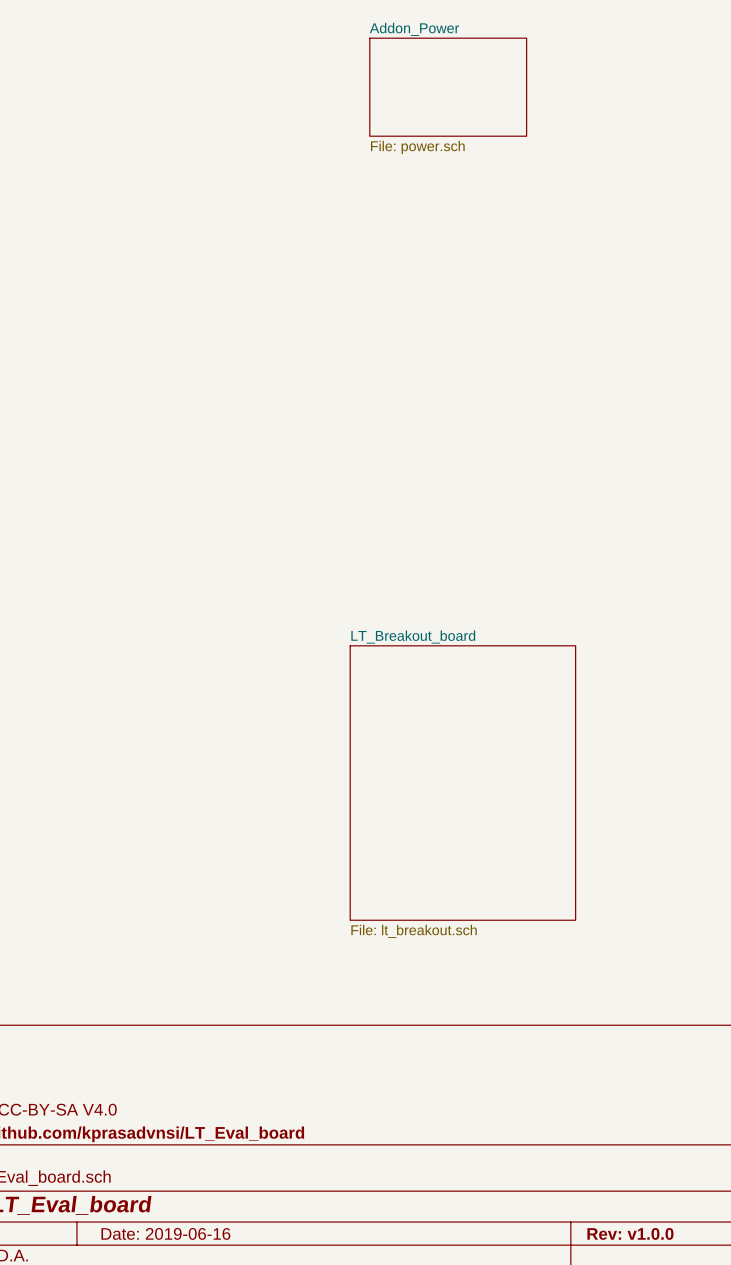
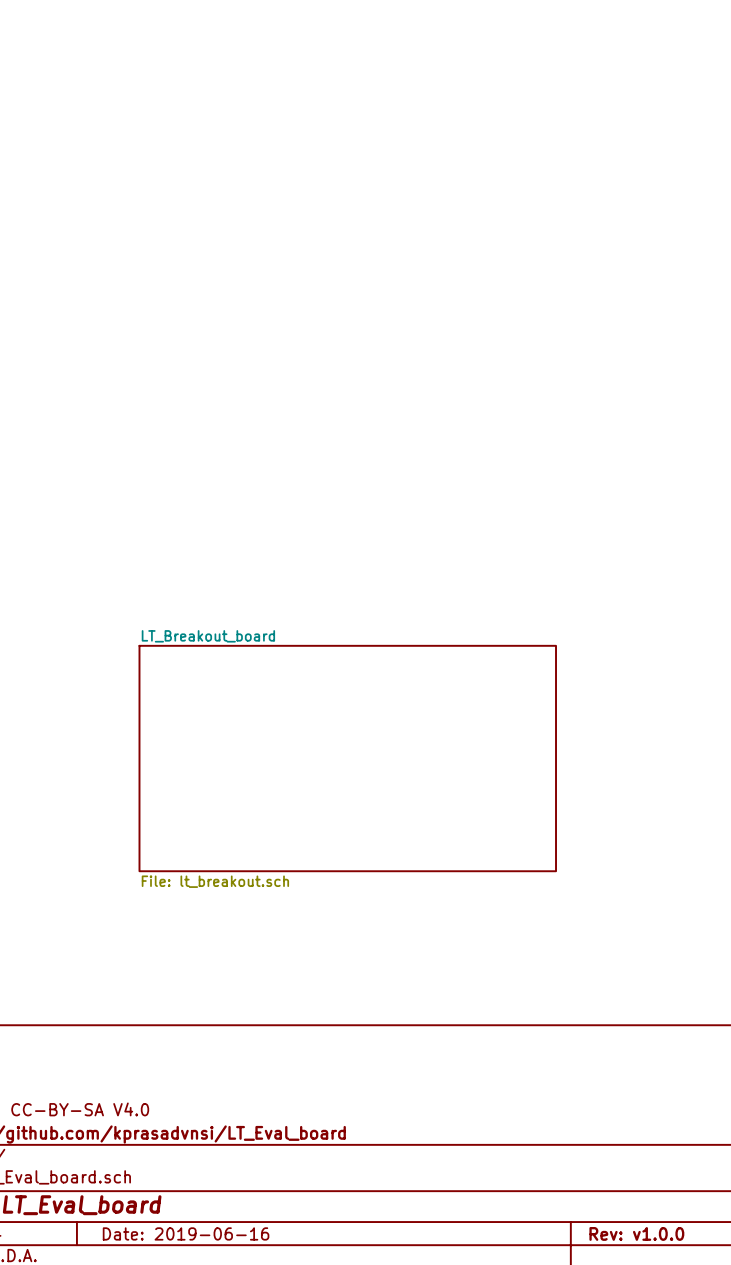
sheet Addon_Power: File: power.sch (448, 87) -> none
sheet LT_Breakout_board: none -> File: lt_breakout.sch (347, 758)
sheet LT_Breakout_board: File: lt_breakout.sch (462, 783) -> none

